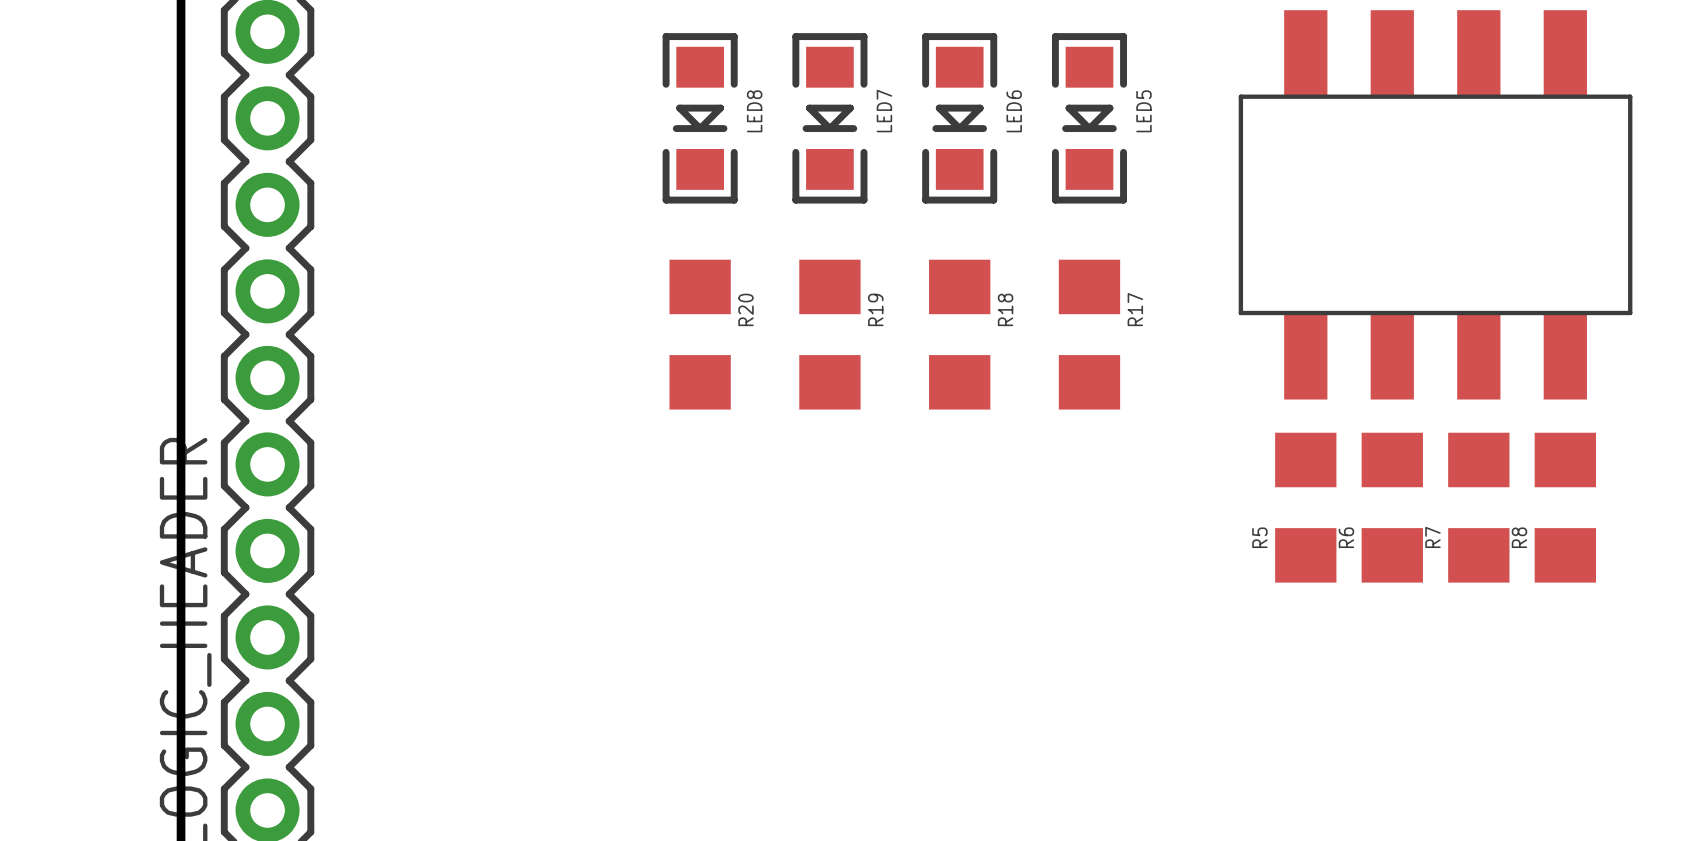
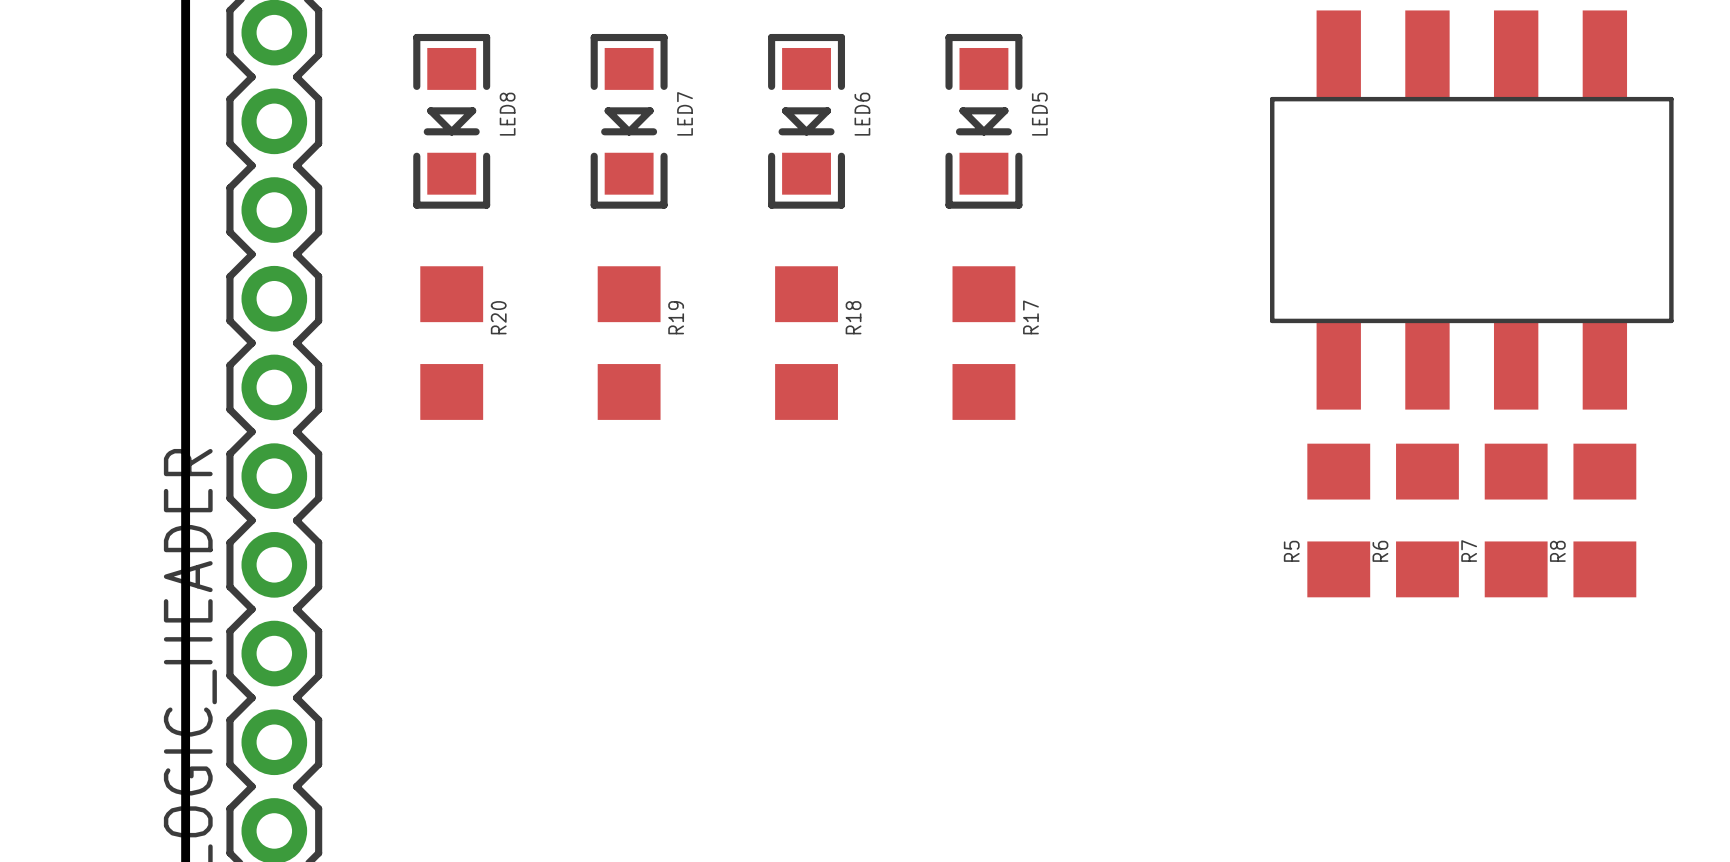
LED6 name: LED6 (1014, 111) -> LED5 (1039, 114)
LED8 position: (700, 118) -> (451, 121)
LED6: none -> (806, 121)
LED7 position: (829, 118) -> (629, 121)
LED5: (1089, 118) -> none
R18 name: R18 (1005, 309) -> R17 (1030, 317)
R20 position: (700, 334) -> (451, 343)
R18: none -> (806, 343)
R19 position: (829, 334) -> (629, 343)
R17: (1089, 334) -> none

